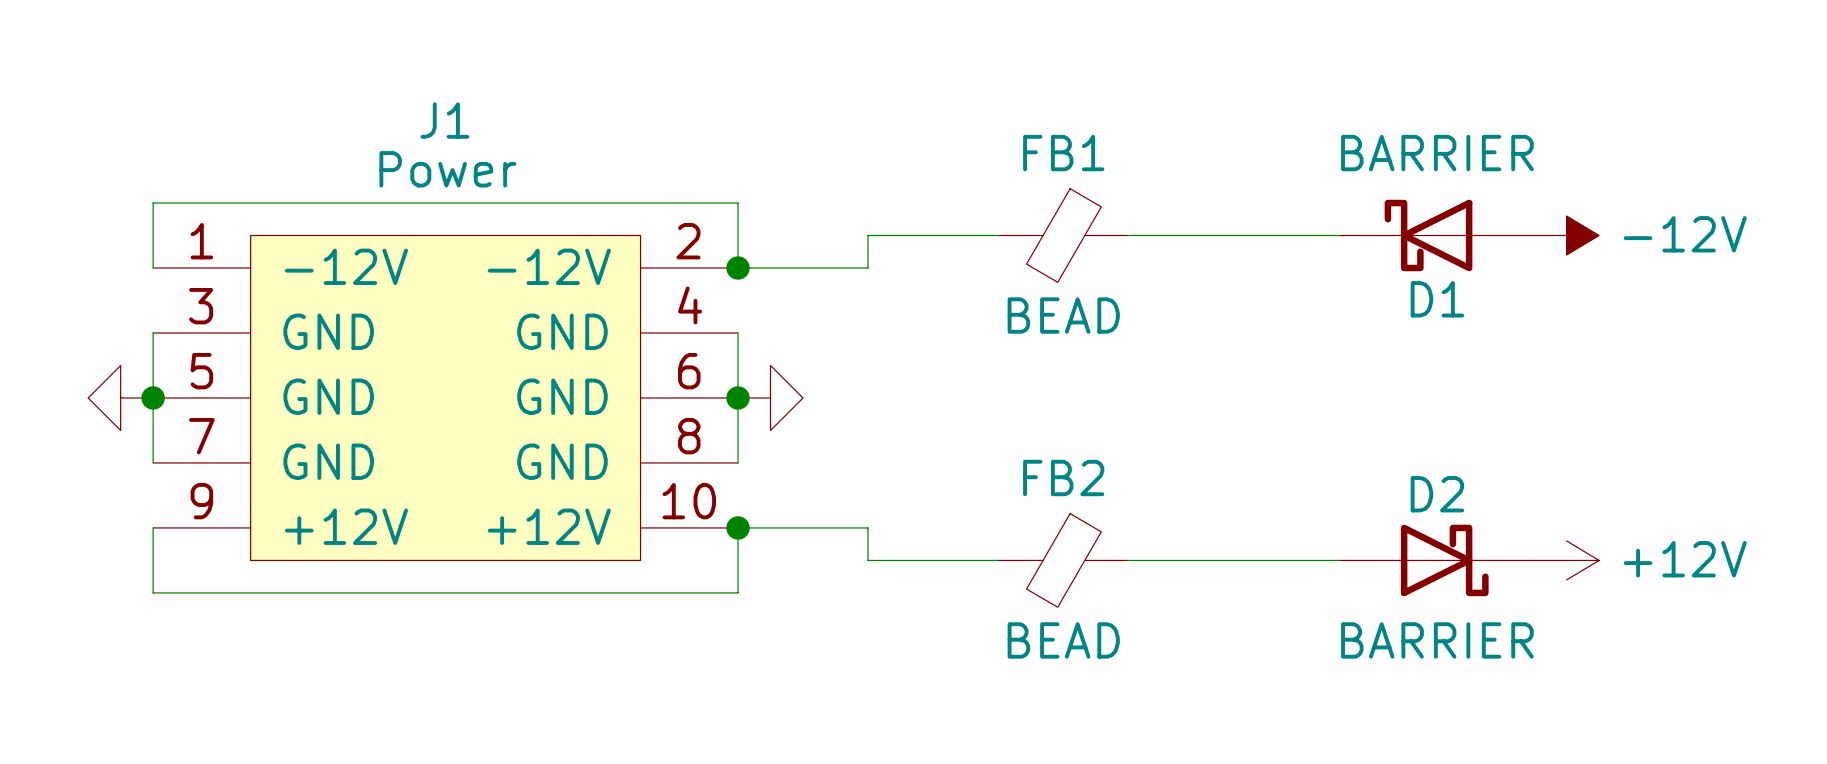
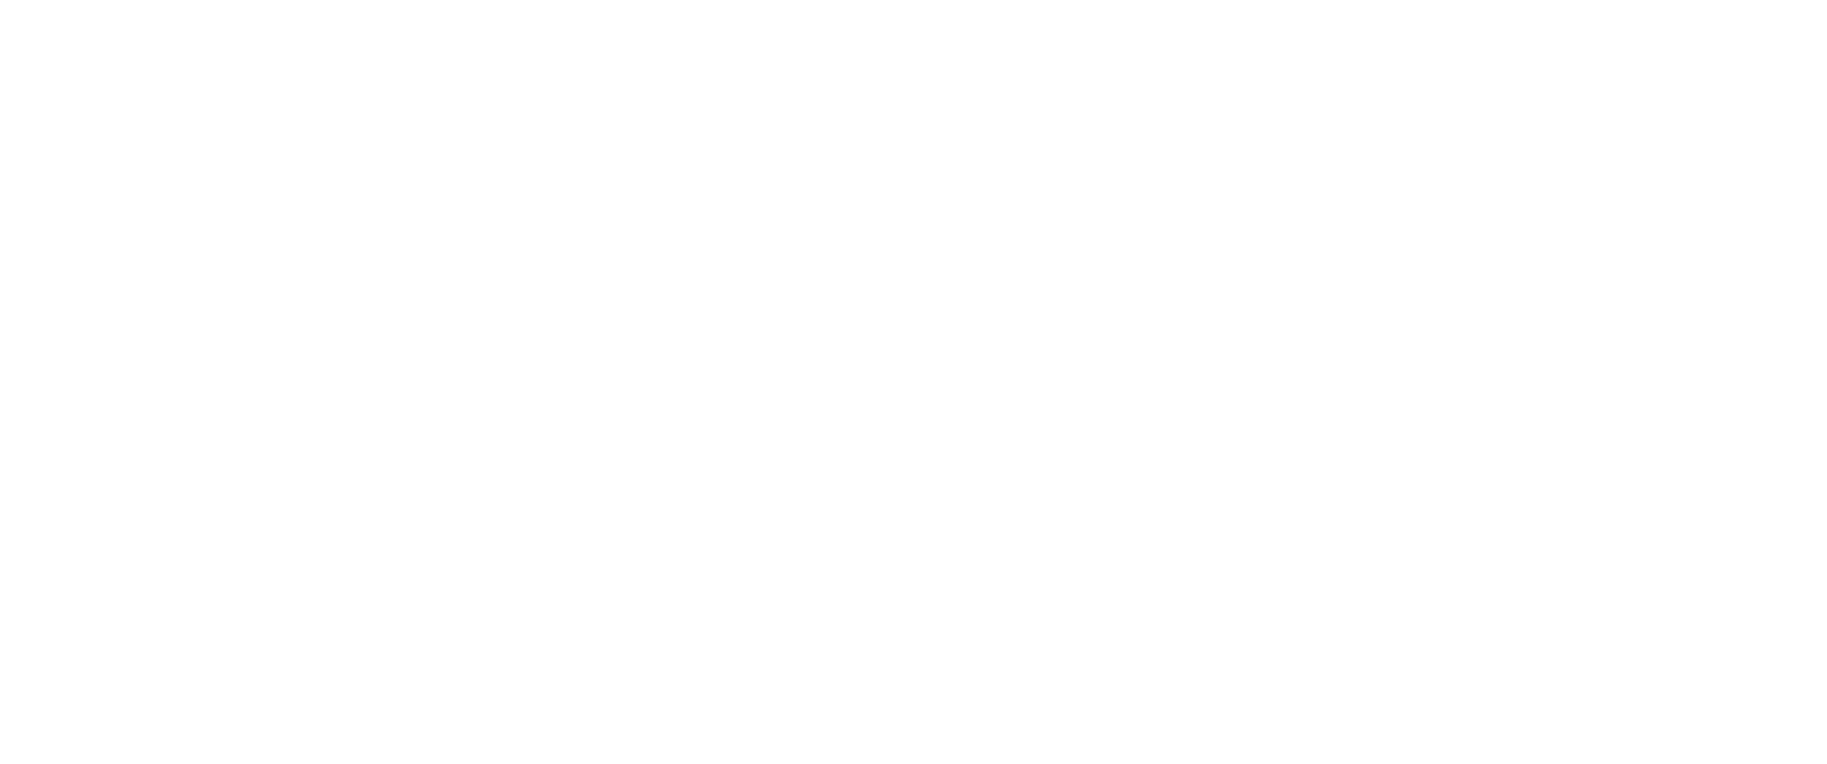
wire: (997, 235) (867, 235) (867, 268) (738, 268) (738, 203) (153, 203) (153, 268) -> none
FB1: BEAD (1062, 235) -> none
wire: (1127, 235) (1339, 235) -> none
D1: BARRIER (1436, 235) -> none
power symbol: -12V (1566, 235) -> none
junction: (738, 268) -> none
wire: (153, 332) (153, 462) -> none
wire: (738, 332) (738, 462) -> none
power symbol: (120, 397) -> none
junction: (153, 397) -> none
J1: Power (445, 397) -> none
junction: (738, 397) -> none
power symbol: (770, 397) -> none
wire: (153, 527) (153, 592) (738, 592) (738, 527) (867, 527) (867, 560) (997, 560) -> none
junction: (738, 527) -> none
FB2: BEAD (1062, 560) -> none
wire: (1127, 560) (1339, 560) -> none
D2: BARRIER (1436, 560) -> none
power symbol: +12V (1566, 560) -> none

